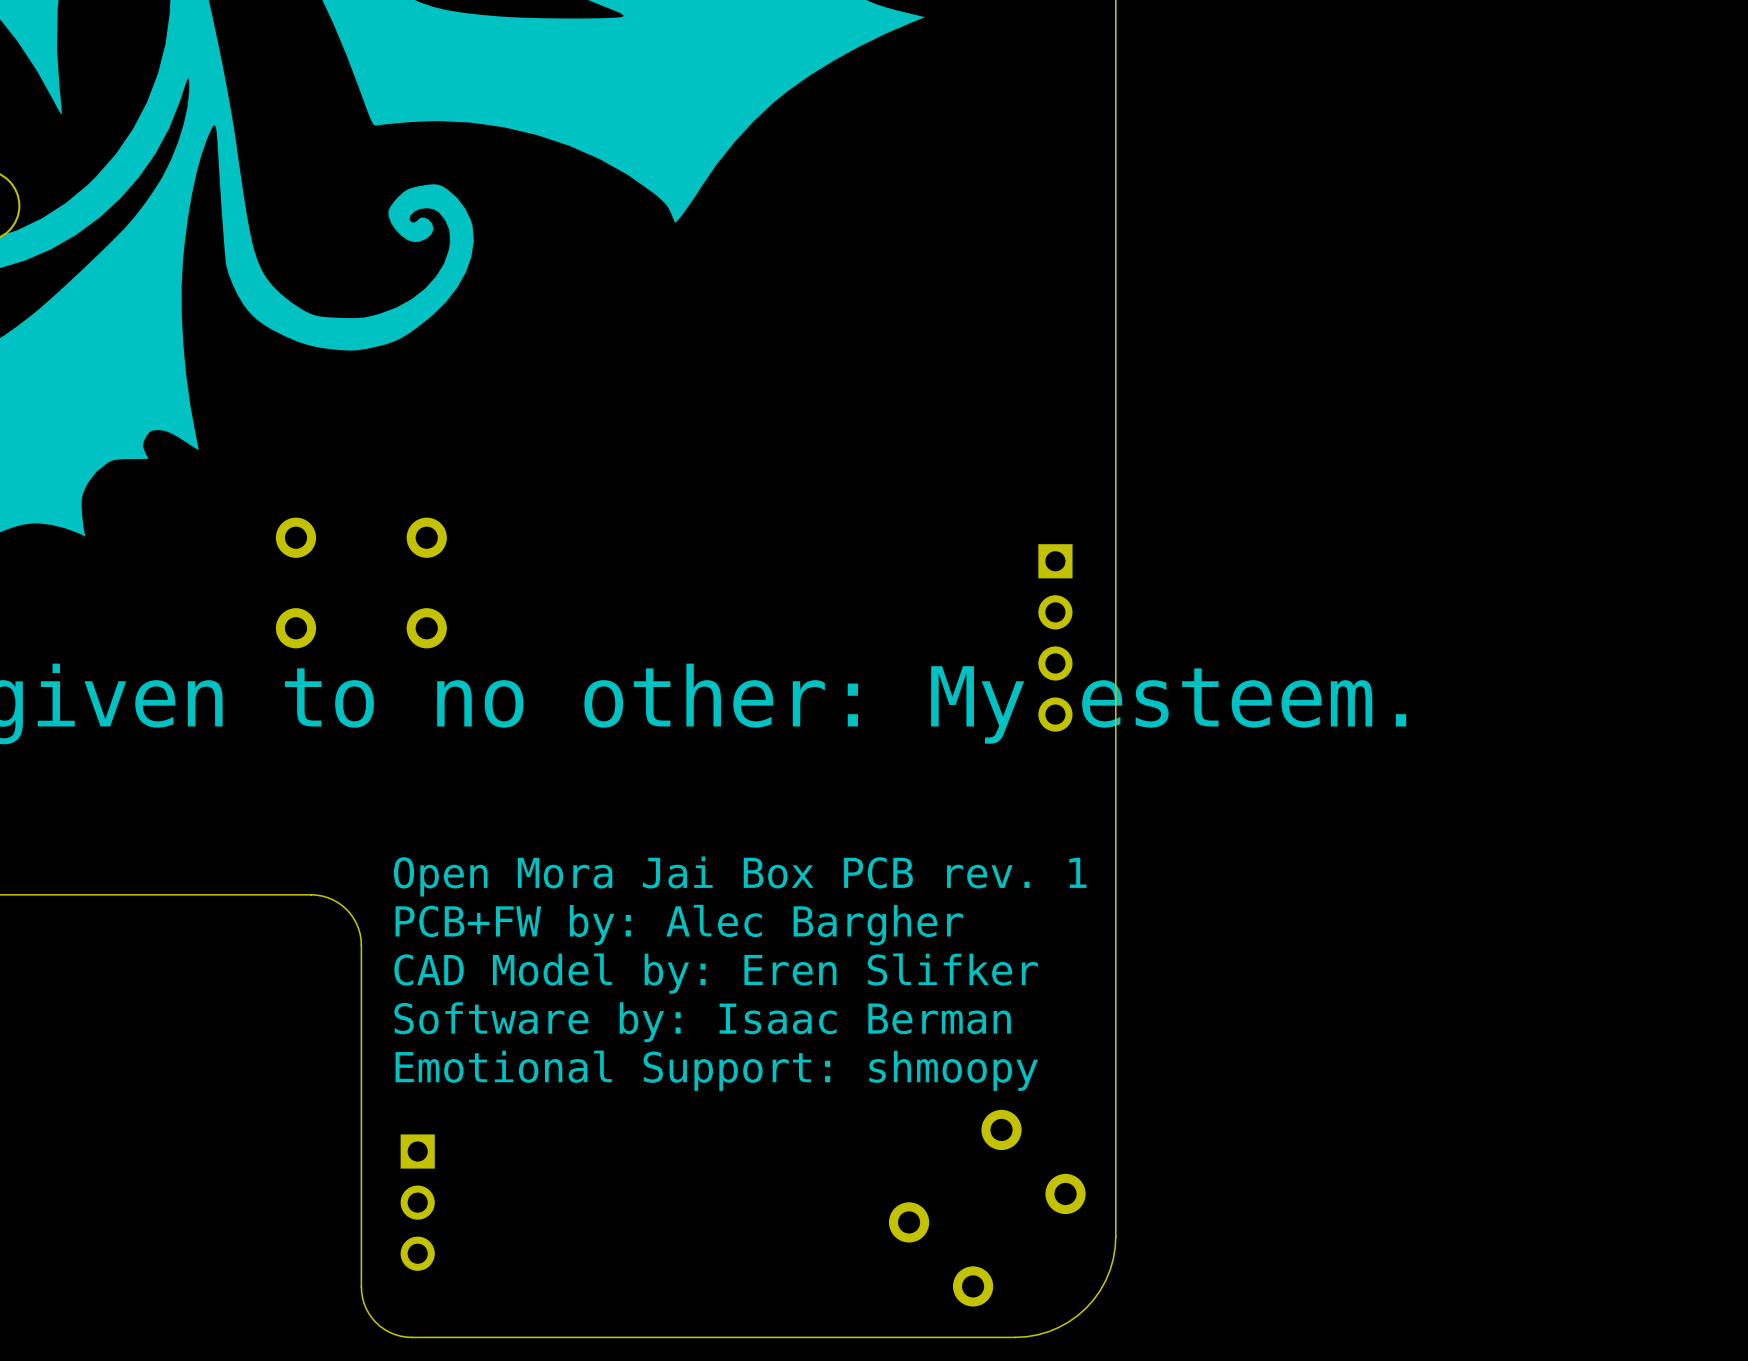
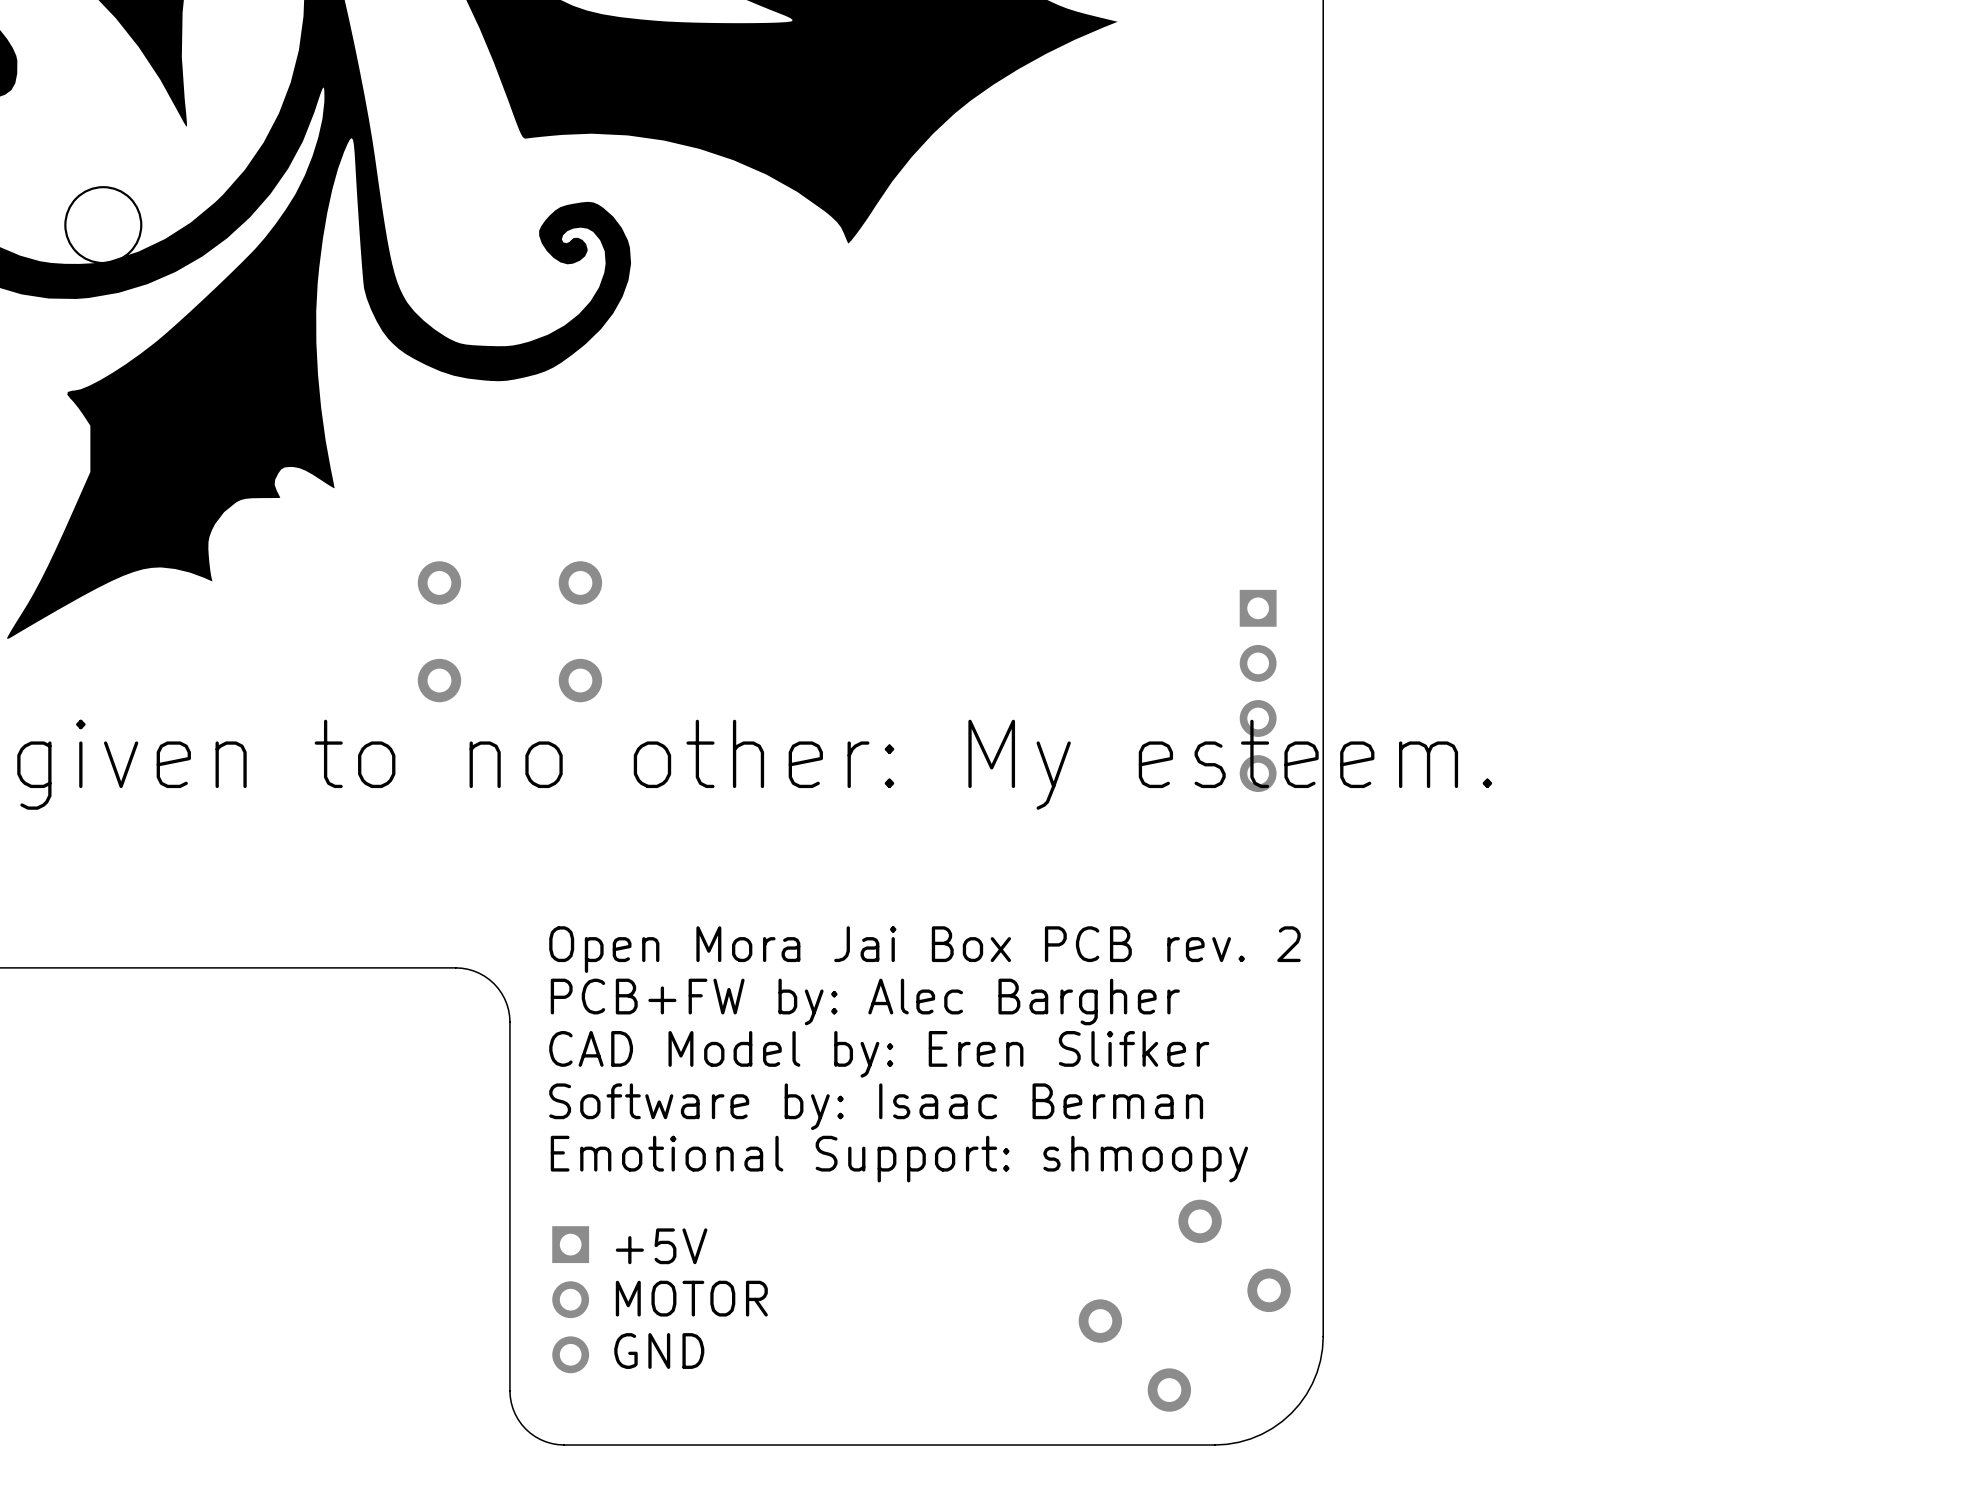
text: Open Mora Jai Box PCB rev. 1 (740, 876) -> Open Mora Jai Box PCB rev. 2 (924, 949)
text: none -> +5V (661, 1246)
text: none -> MOTOR (691, 1298)
text: none -> GND (659, 1351)

